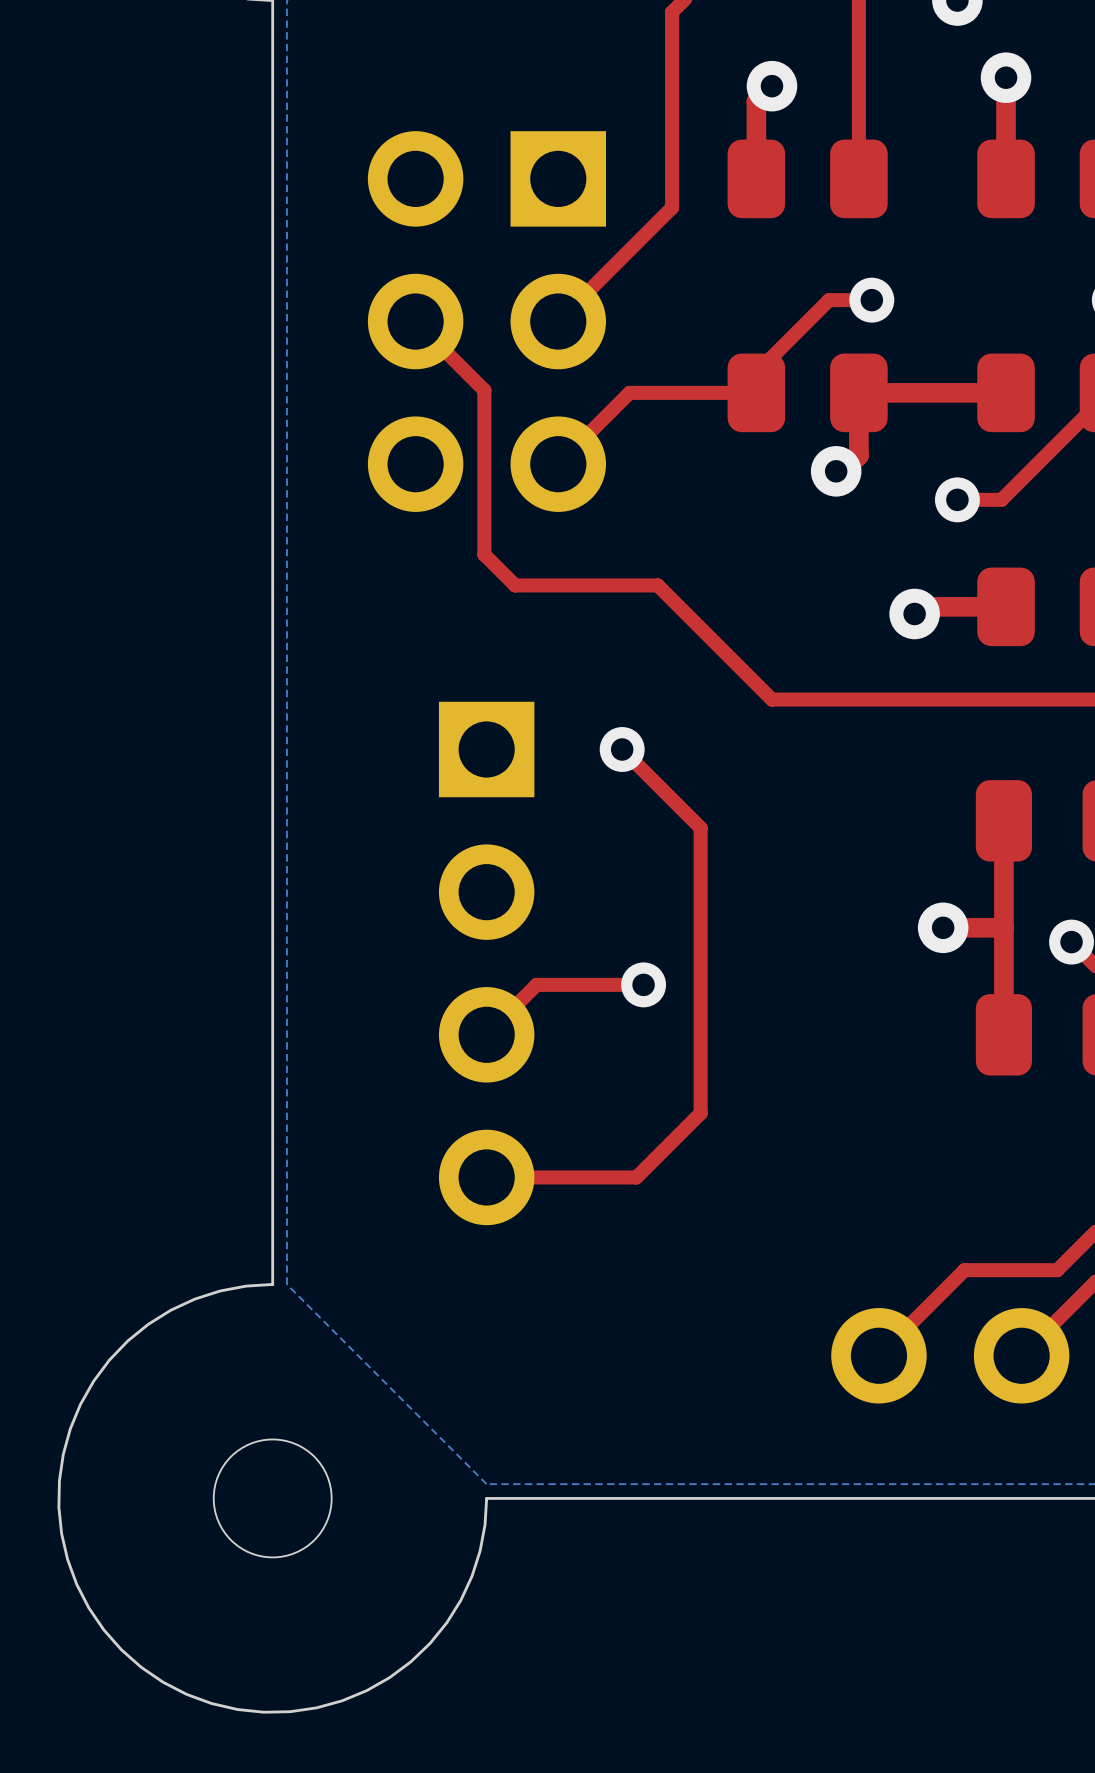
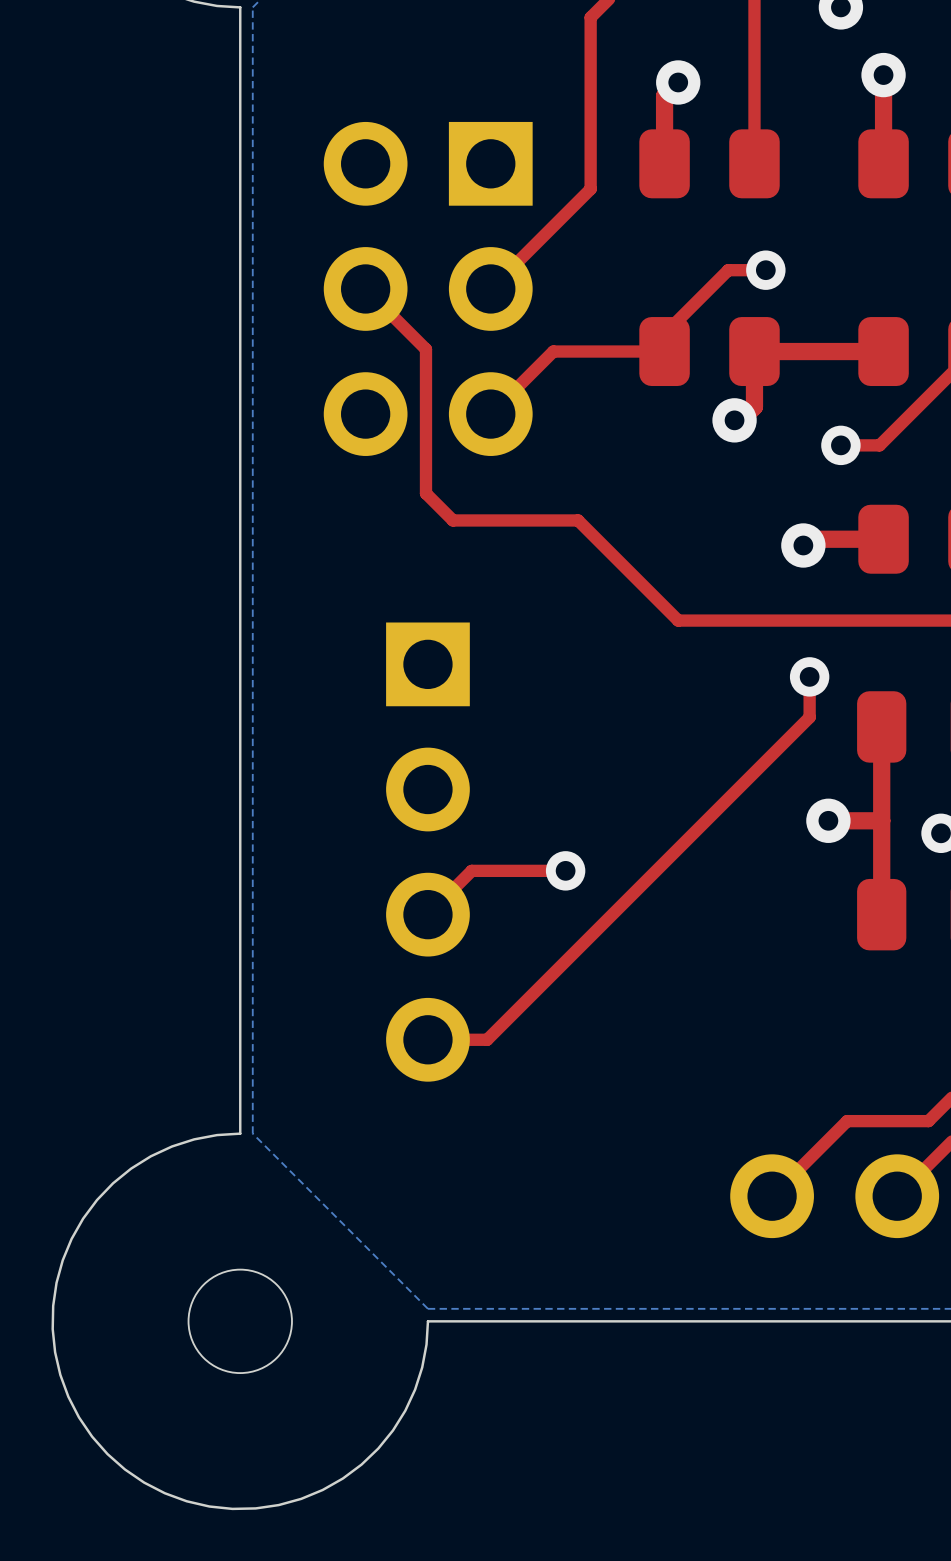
top track: (622, 749) (700, 827) (700, 1113) (636, 1177) (554, 1177) -> (809, 676) (809, 717) (487, 1039)
via: (622, 749) -> none
via: none -> (809, 676)

